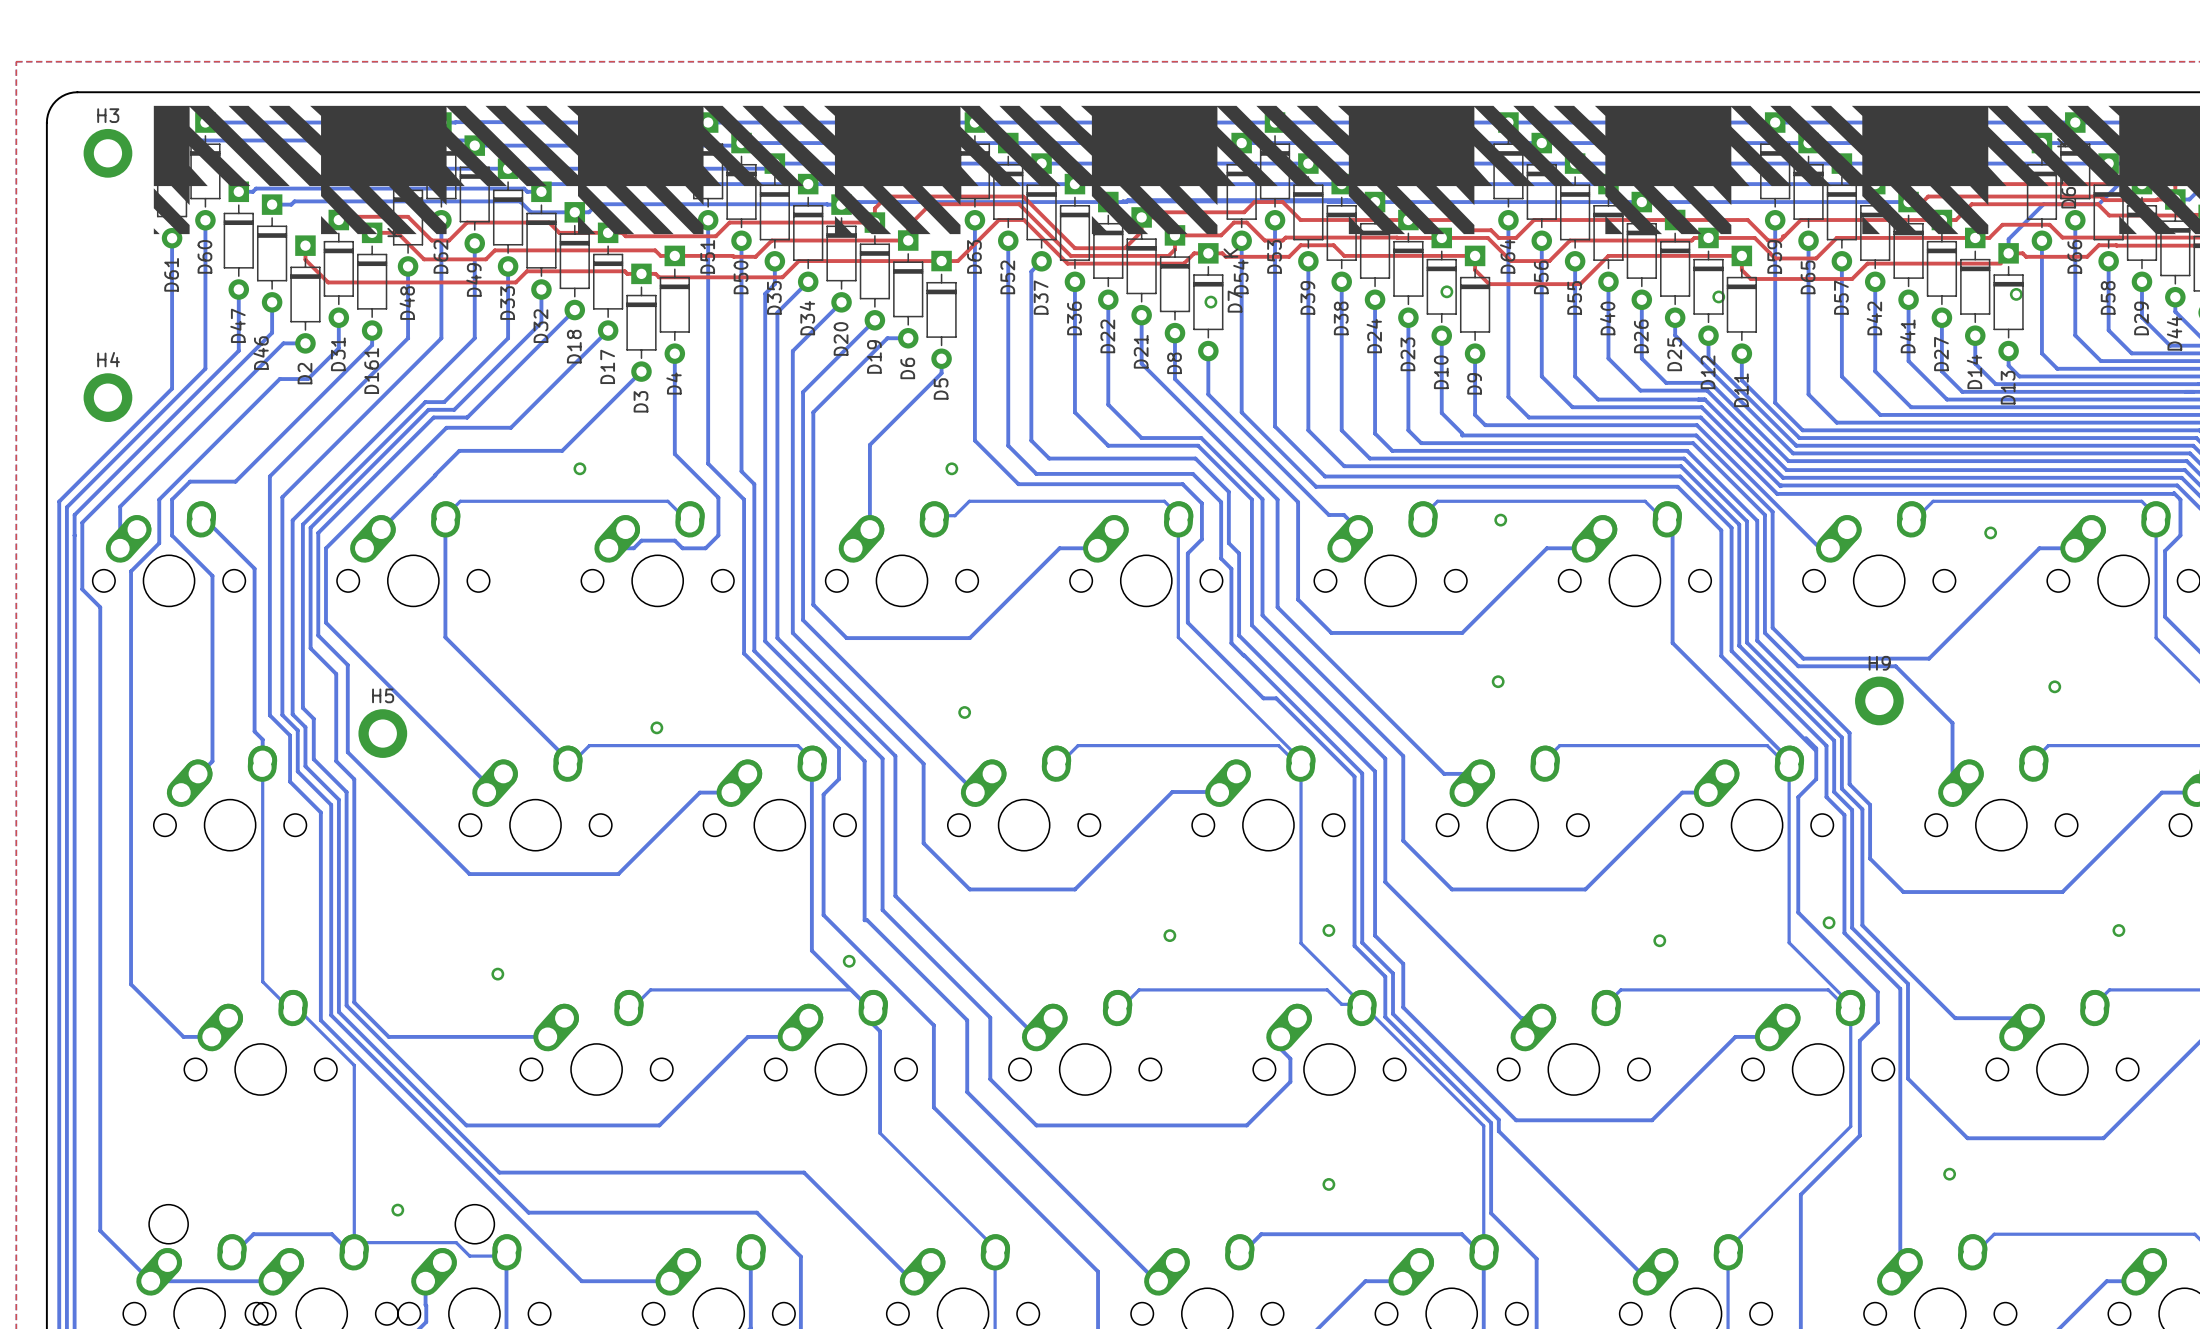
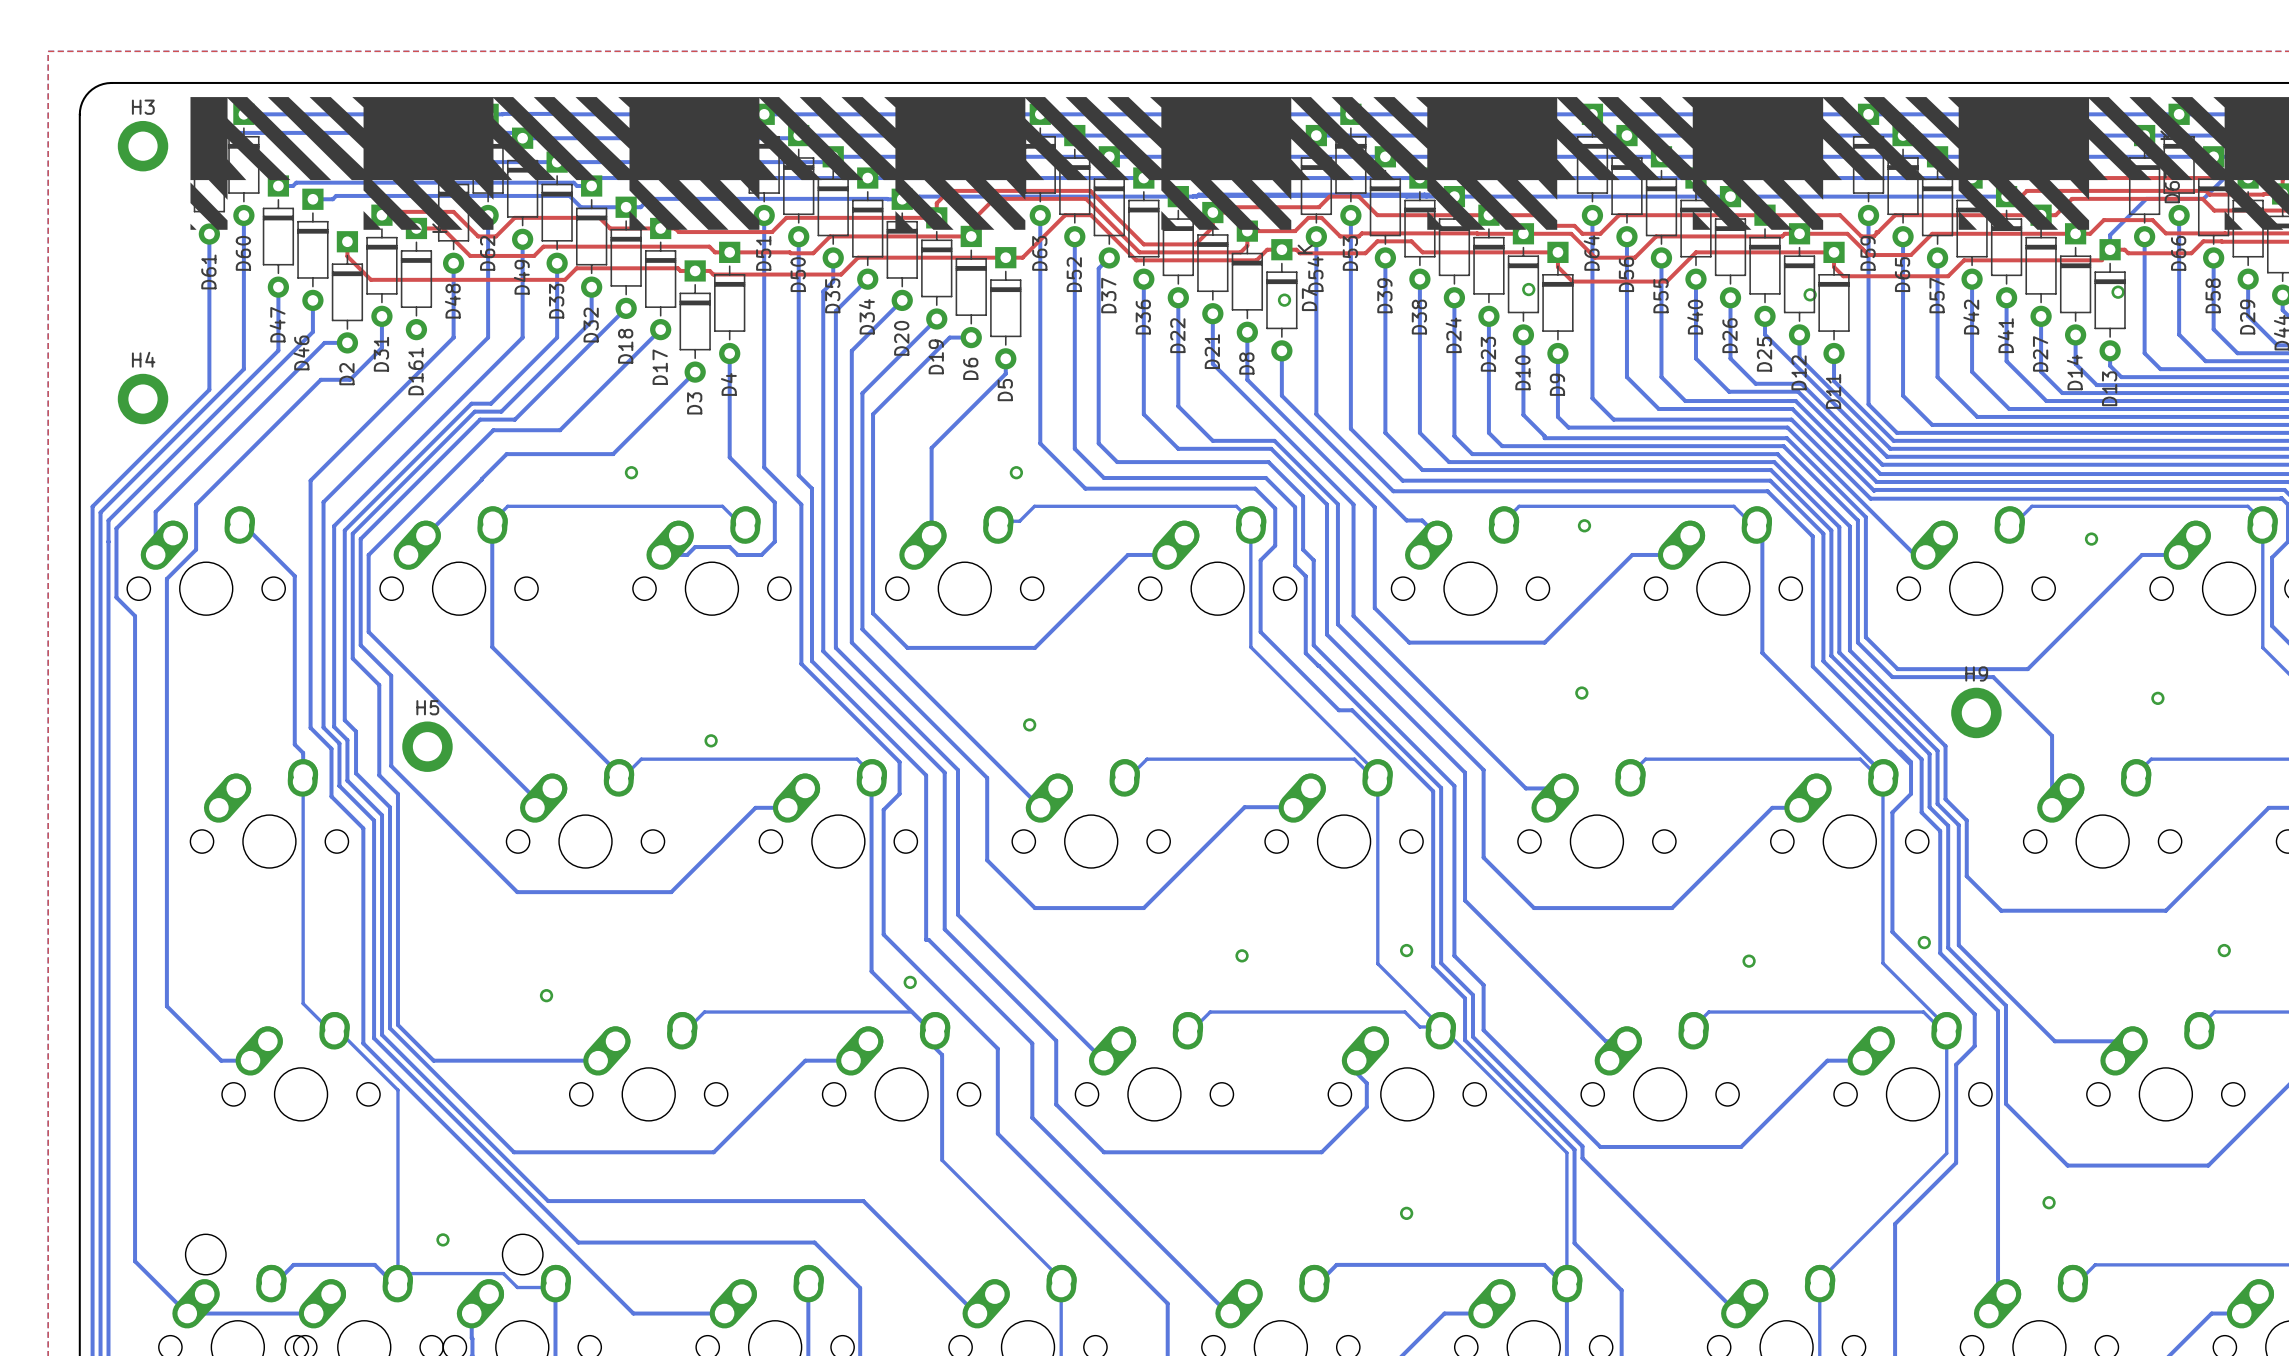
bottom track: (372, 330) (372, 345) (235, 481) (190, 481) (172, 499) (172, 535) (212, 575) (212, 761) (181, 792) -> none

